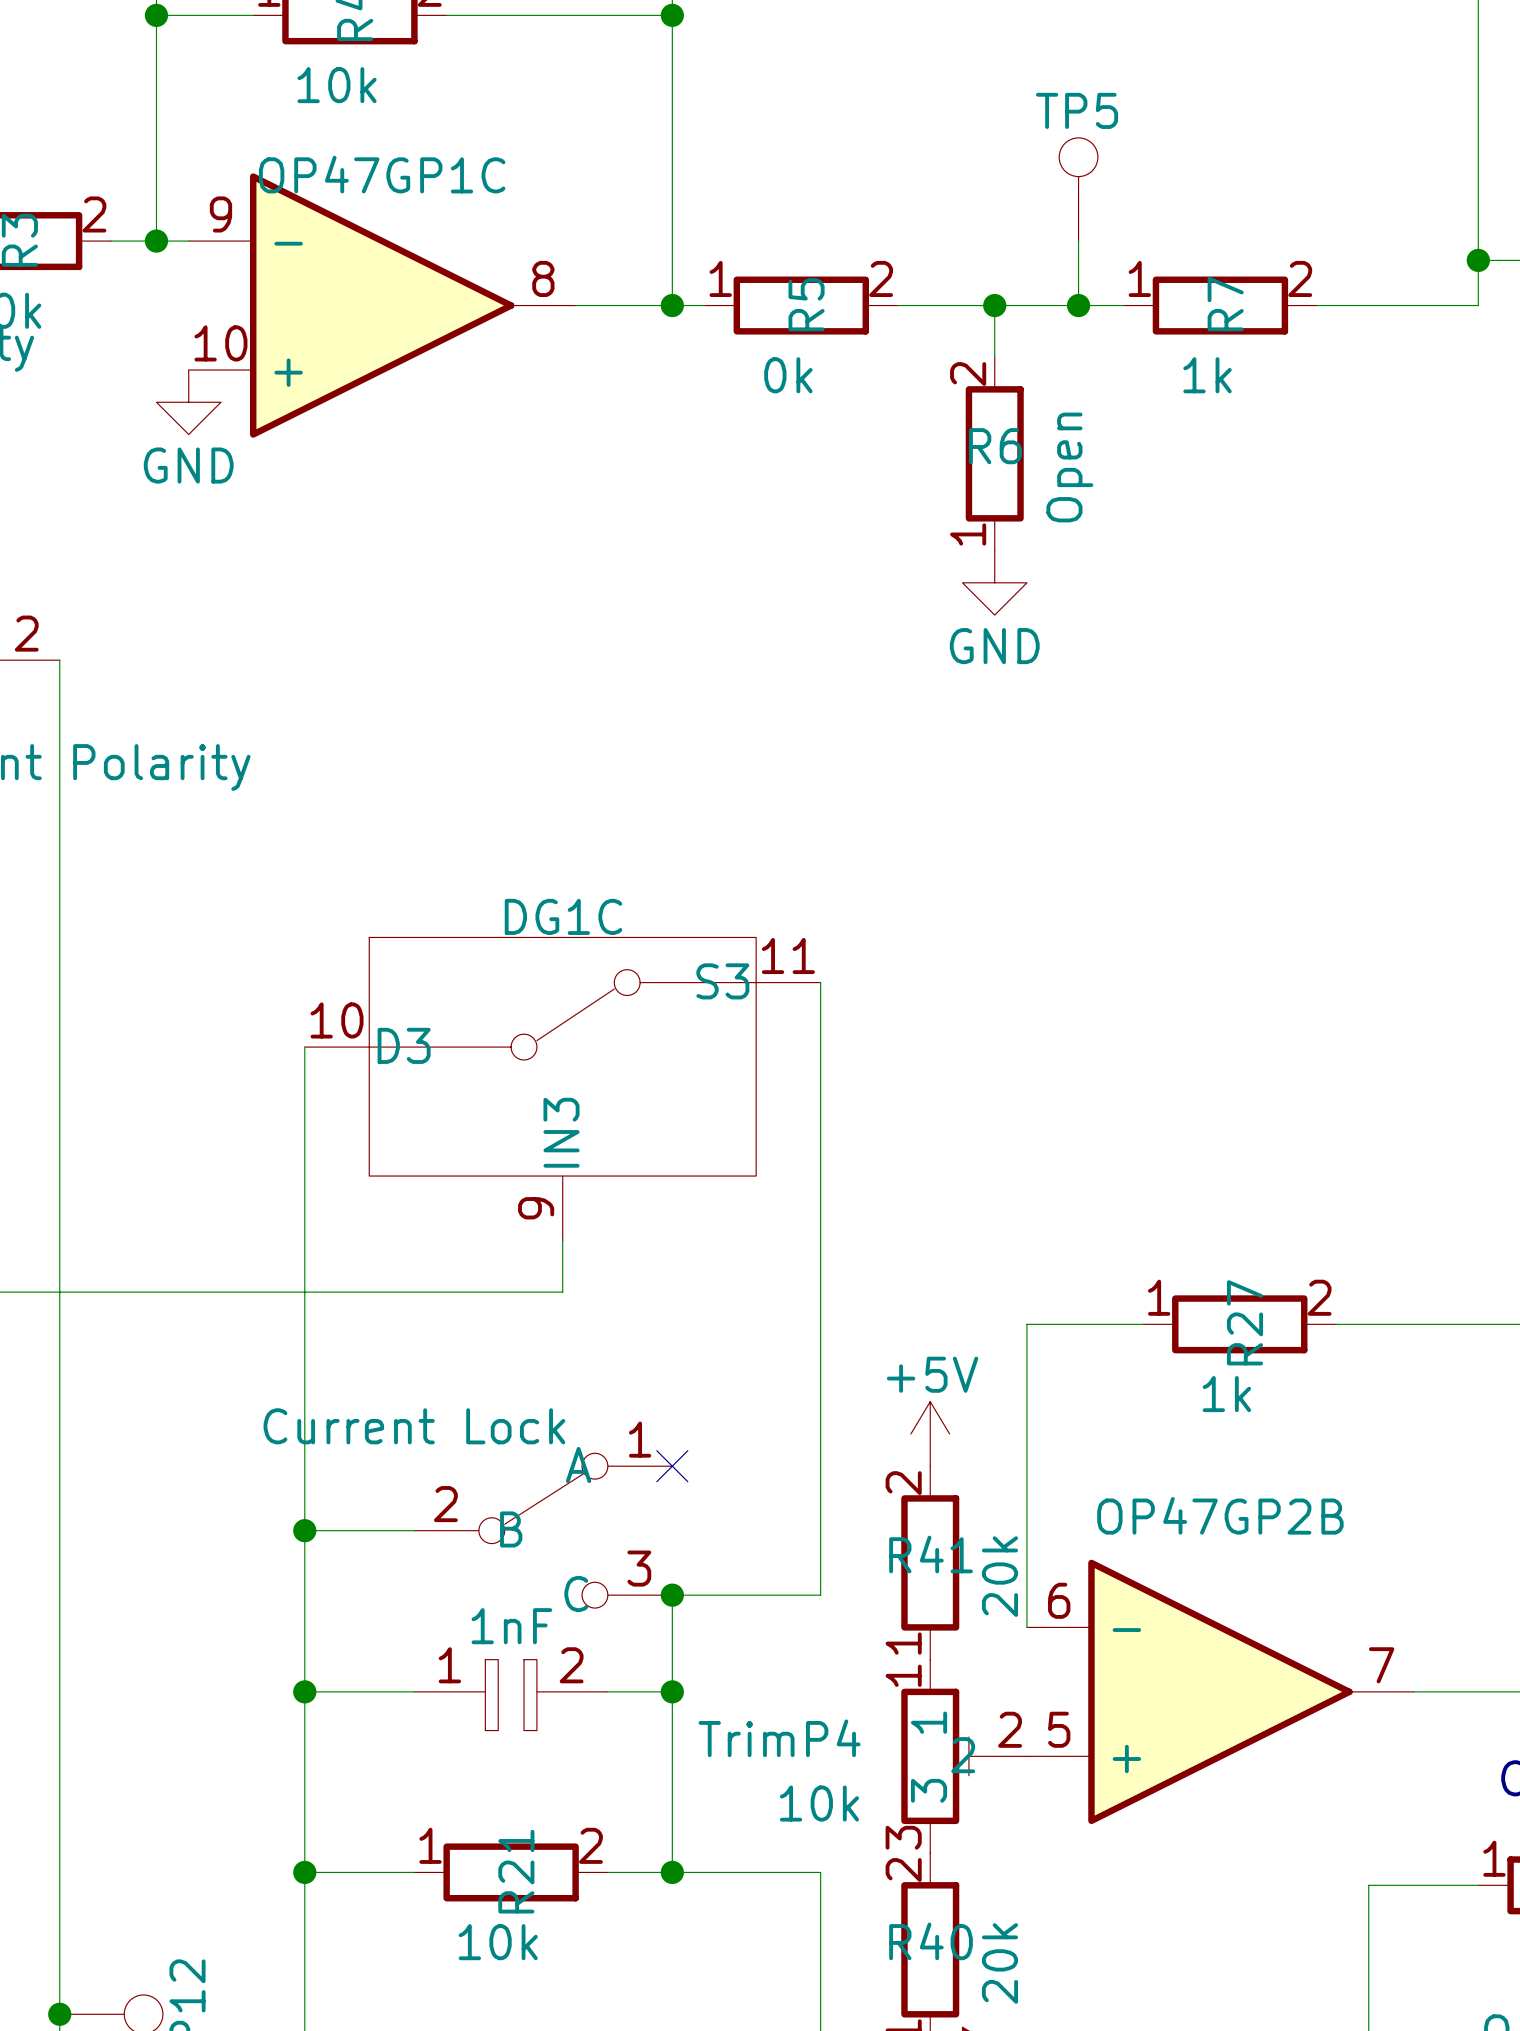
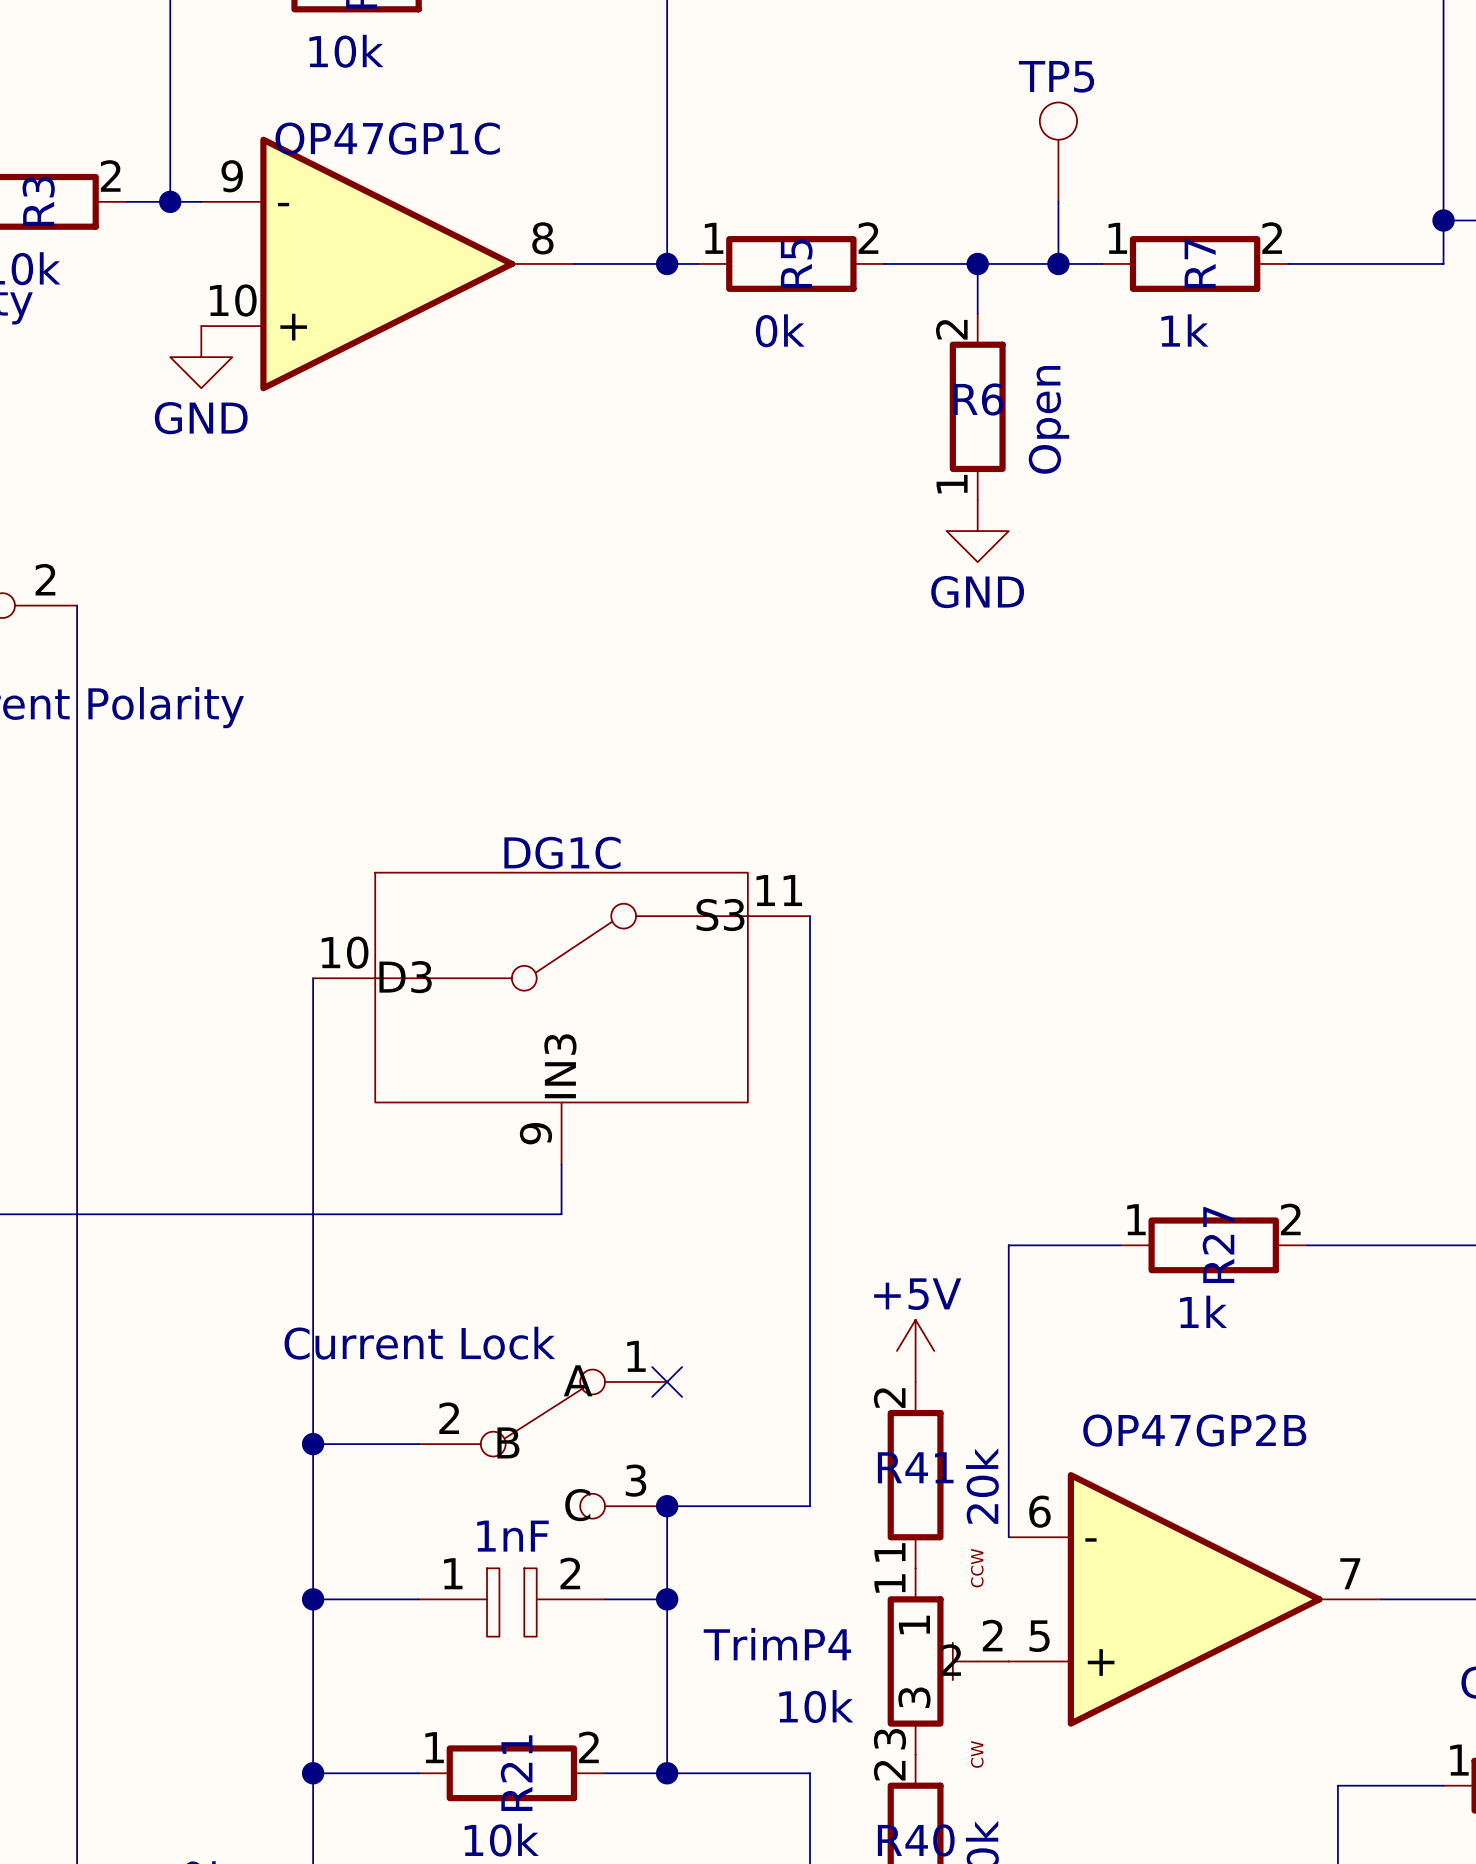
TrimP4 text: none -> CCW (977, 1568)
TrimP4 text: none -> CW (977, 1754)

